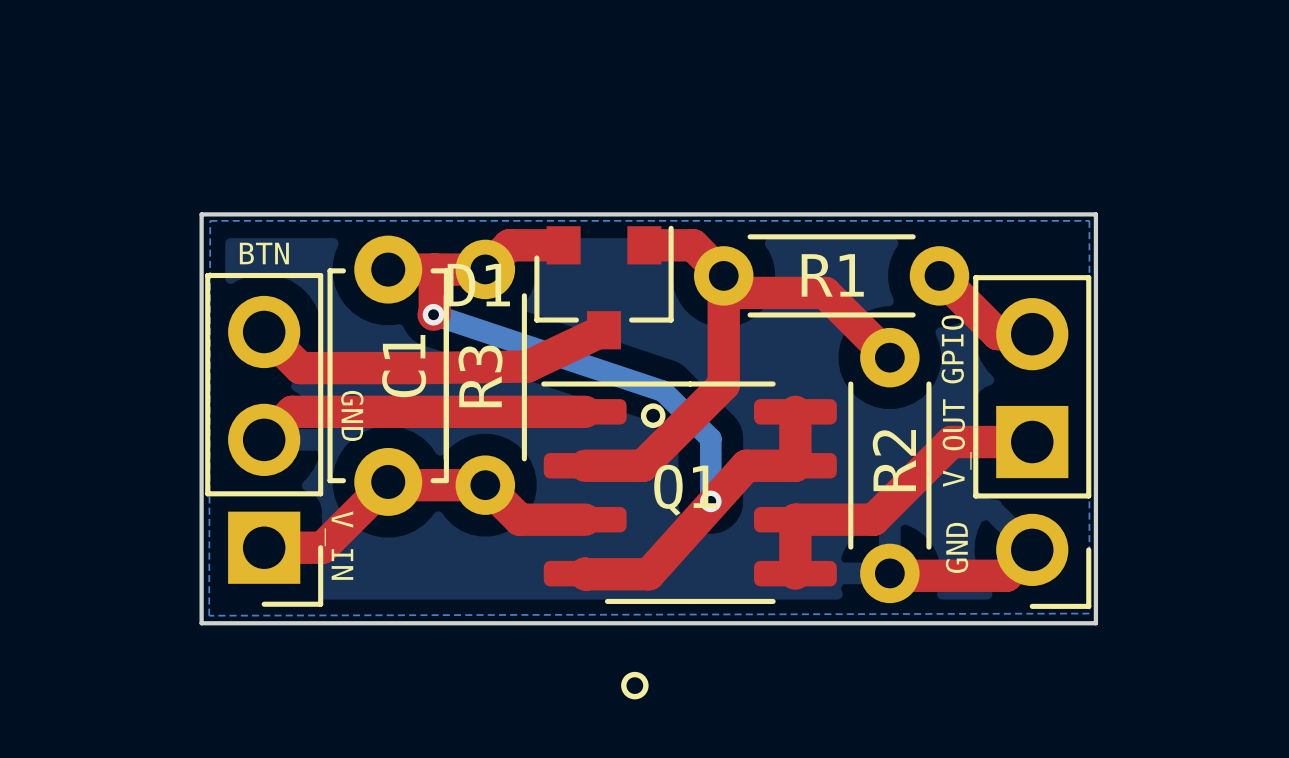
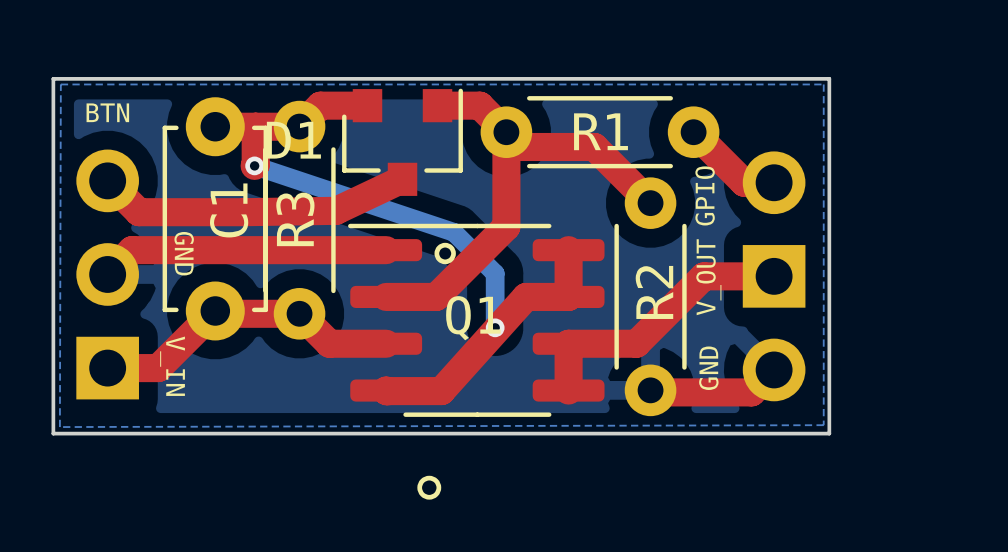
part side: top (264, 439) -> bottom (107, 274)
part side: top (1032, 442) -> bottom (774, 276)

